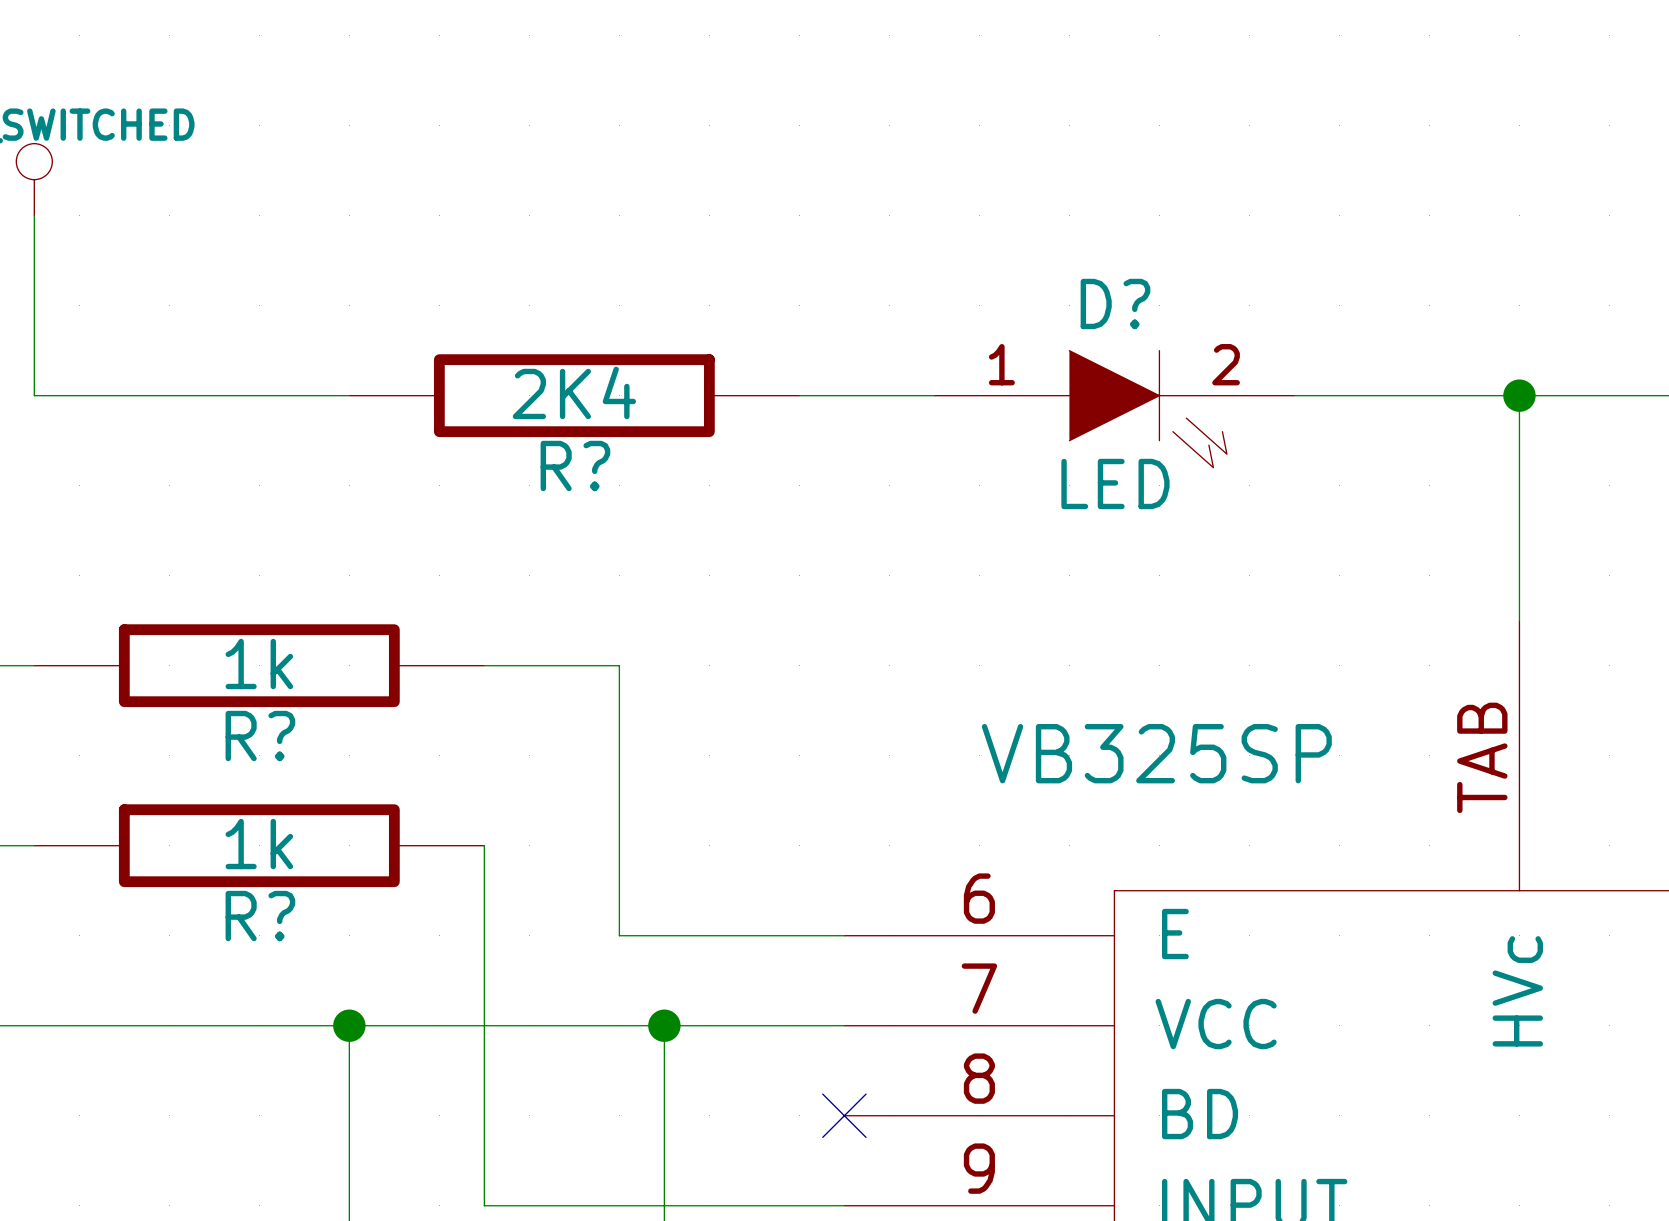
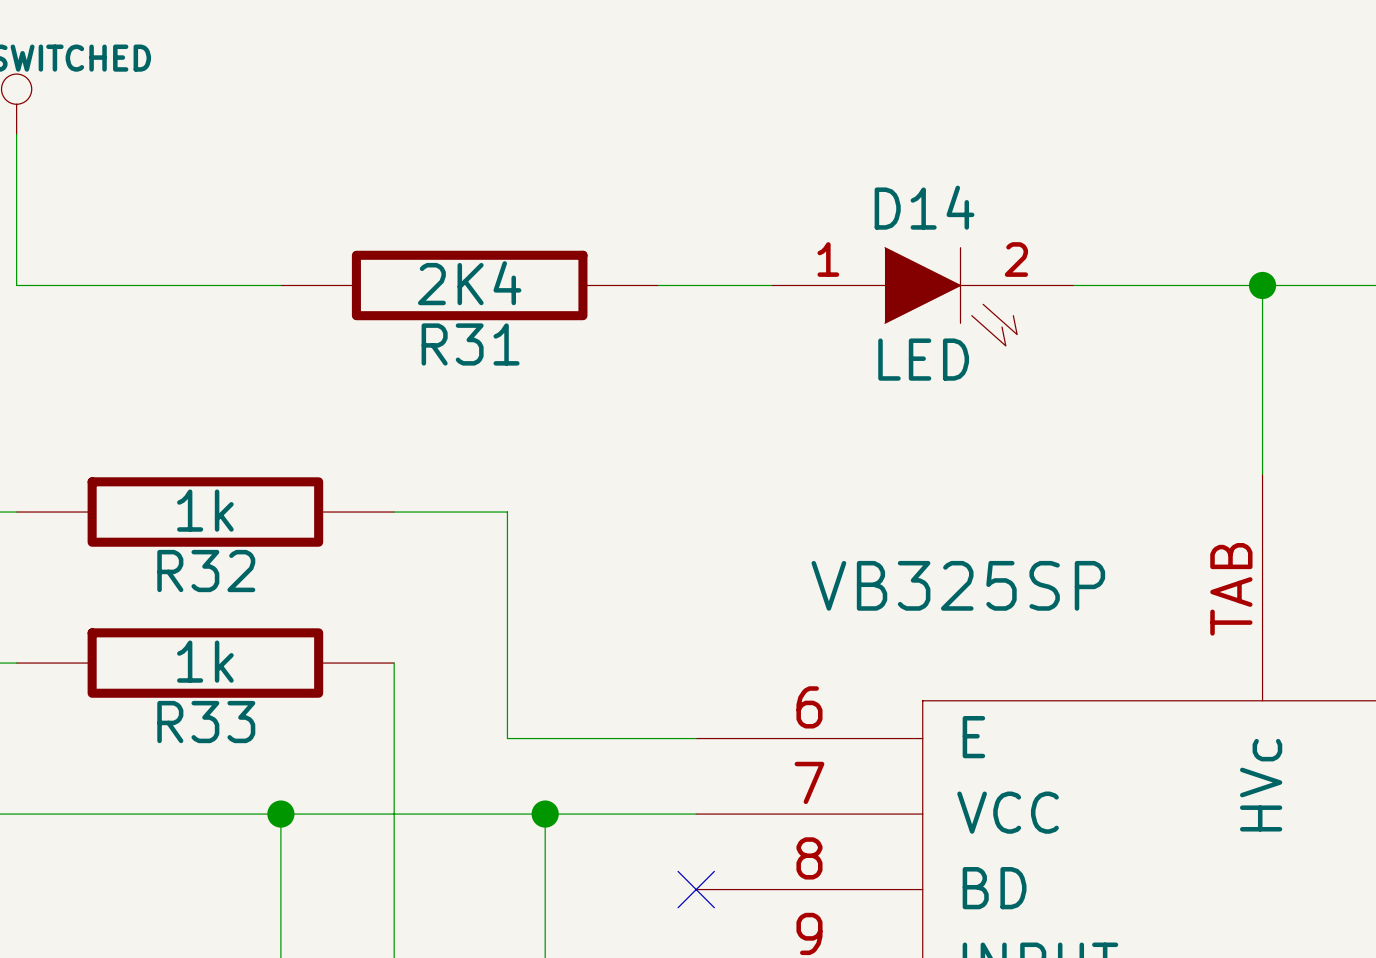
D? name: D? (1115, 303) -> D14 (924, 207)
R? name: R? (575, 465) -> R31 (470, 344)
R? name: R? (260, 736) -> R32 (206, 571)
R? name: R? (260, 916) -> R33 (206, 722)

